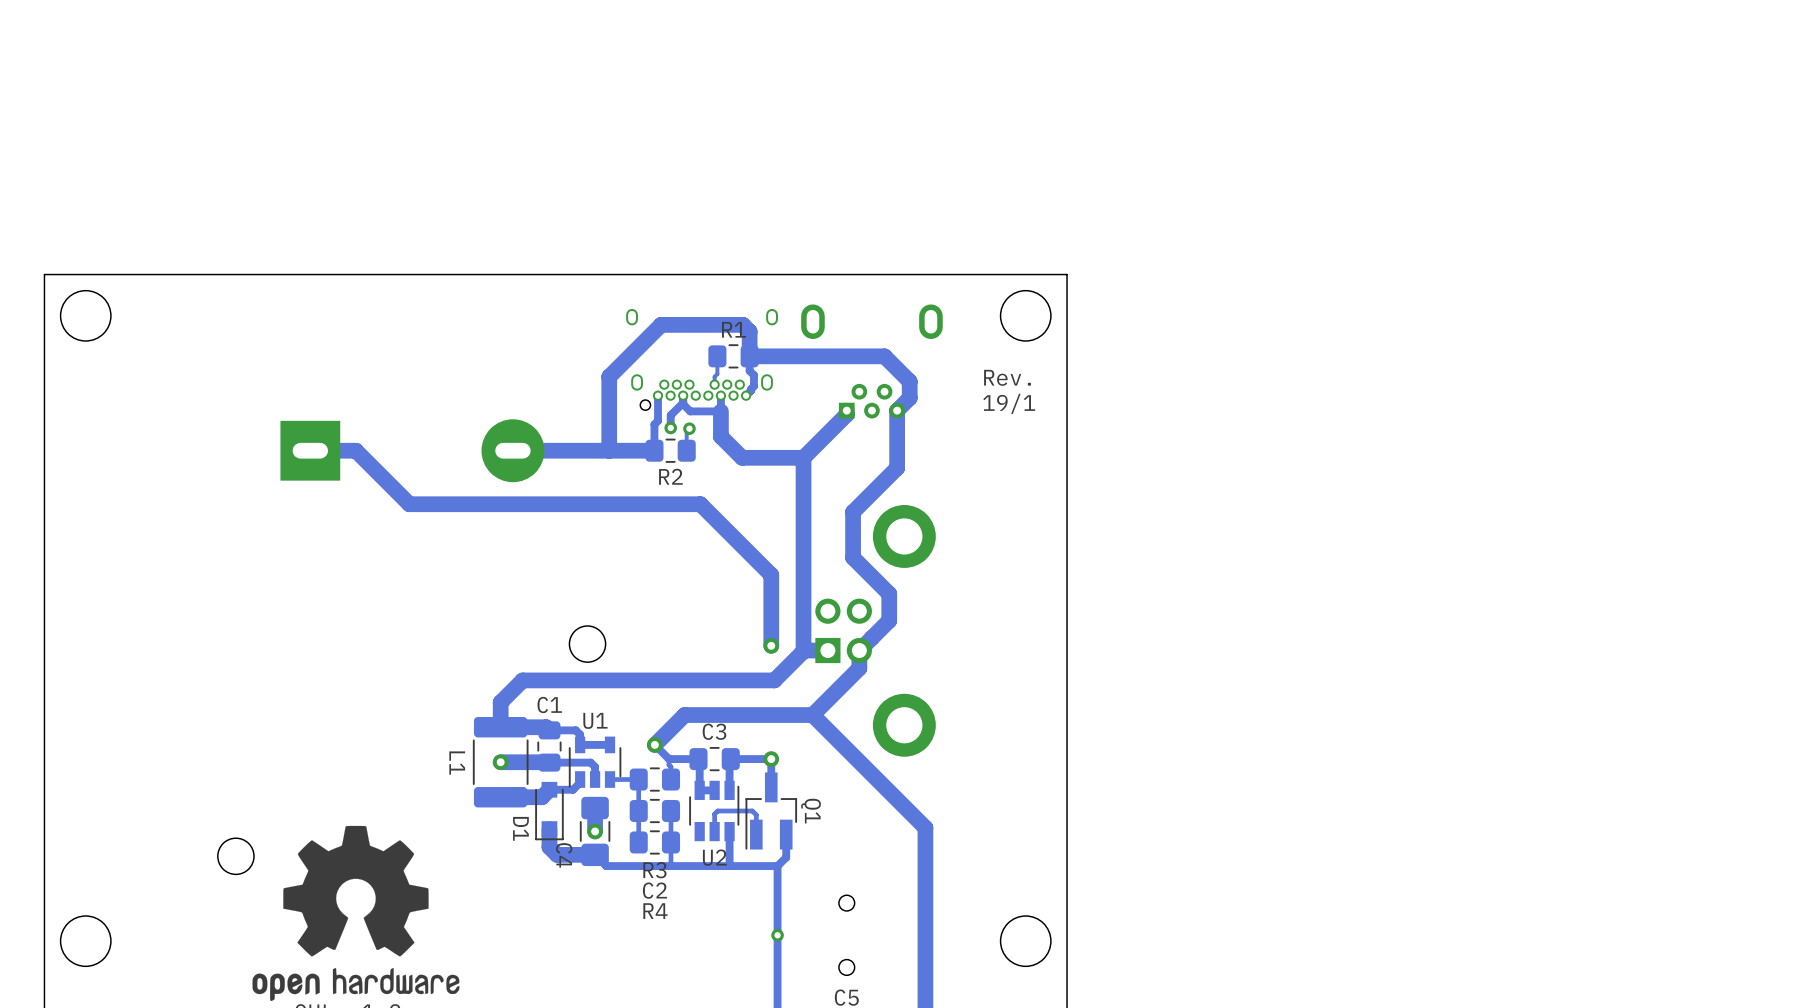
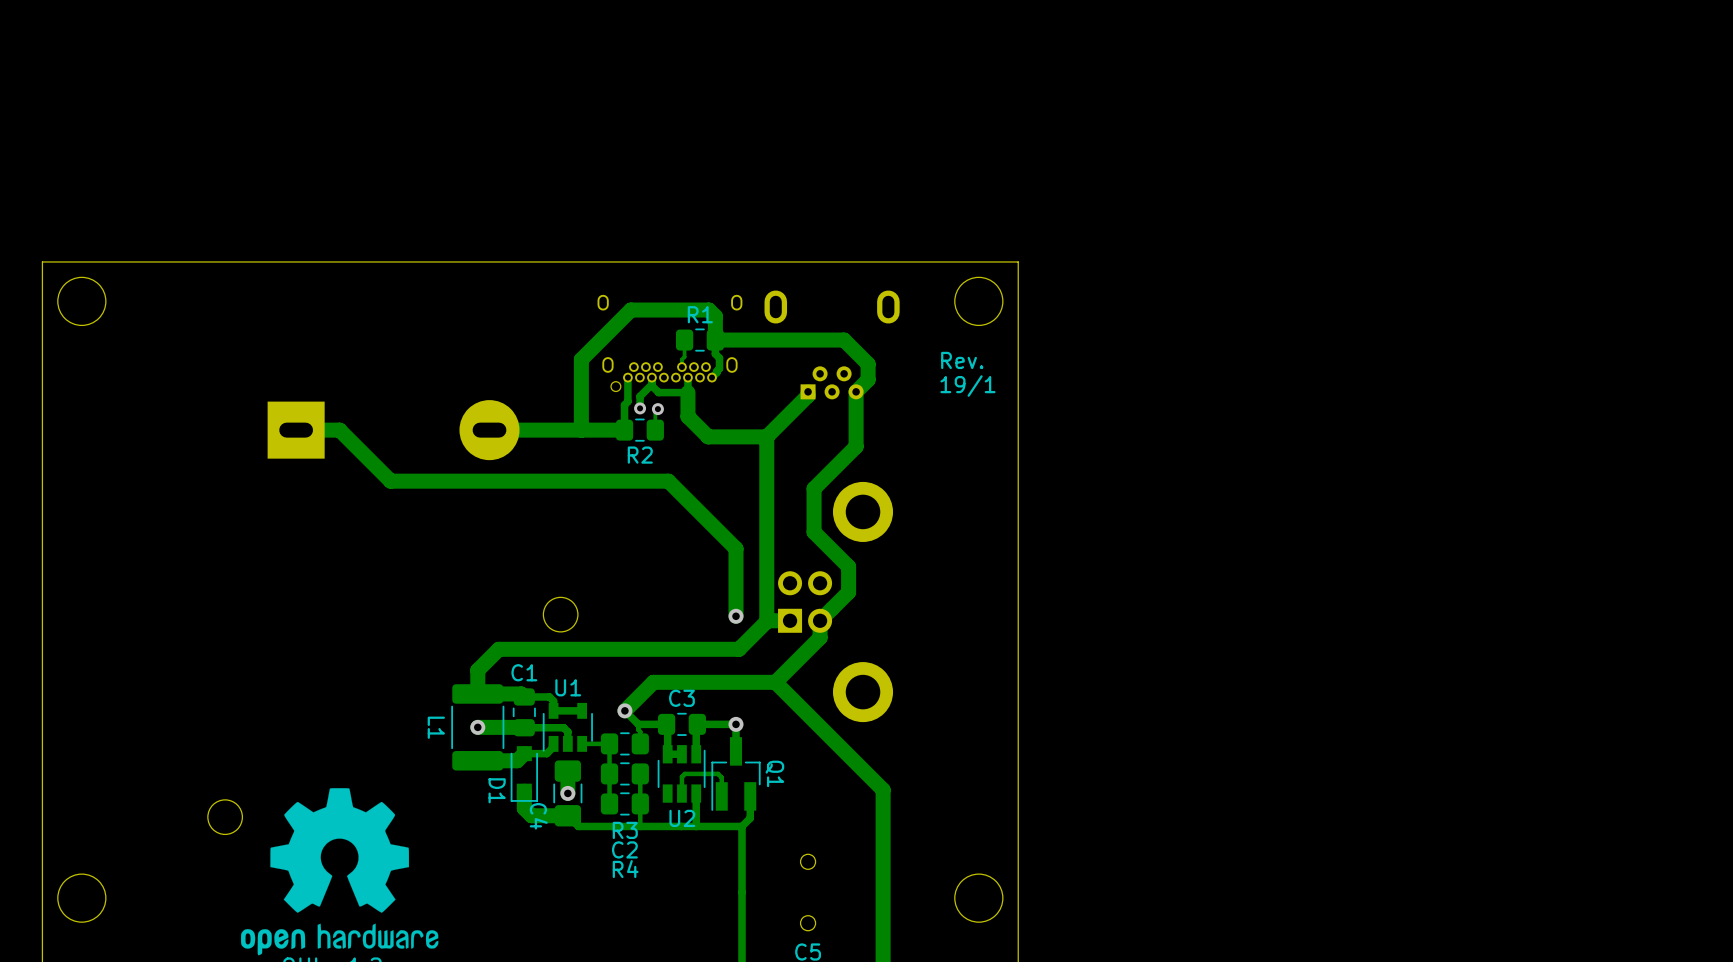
via: (777, 935) -> none

